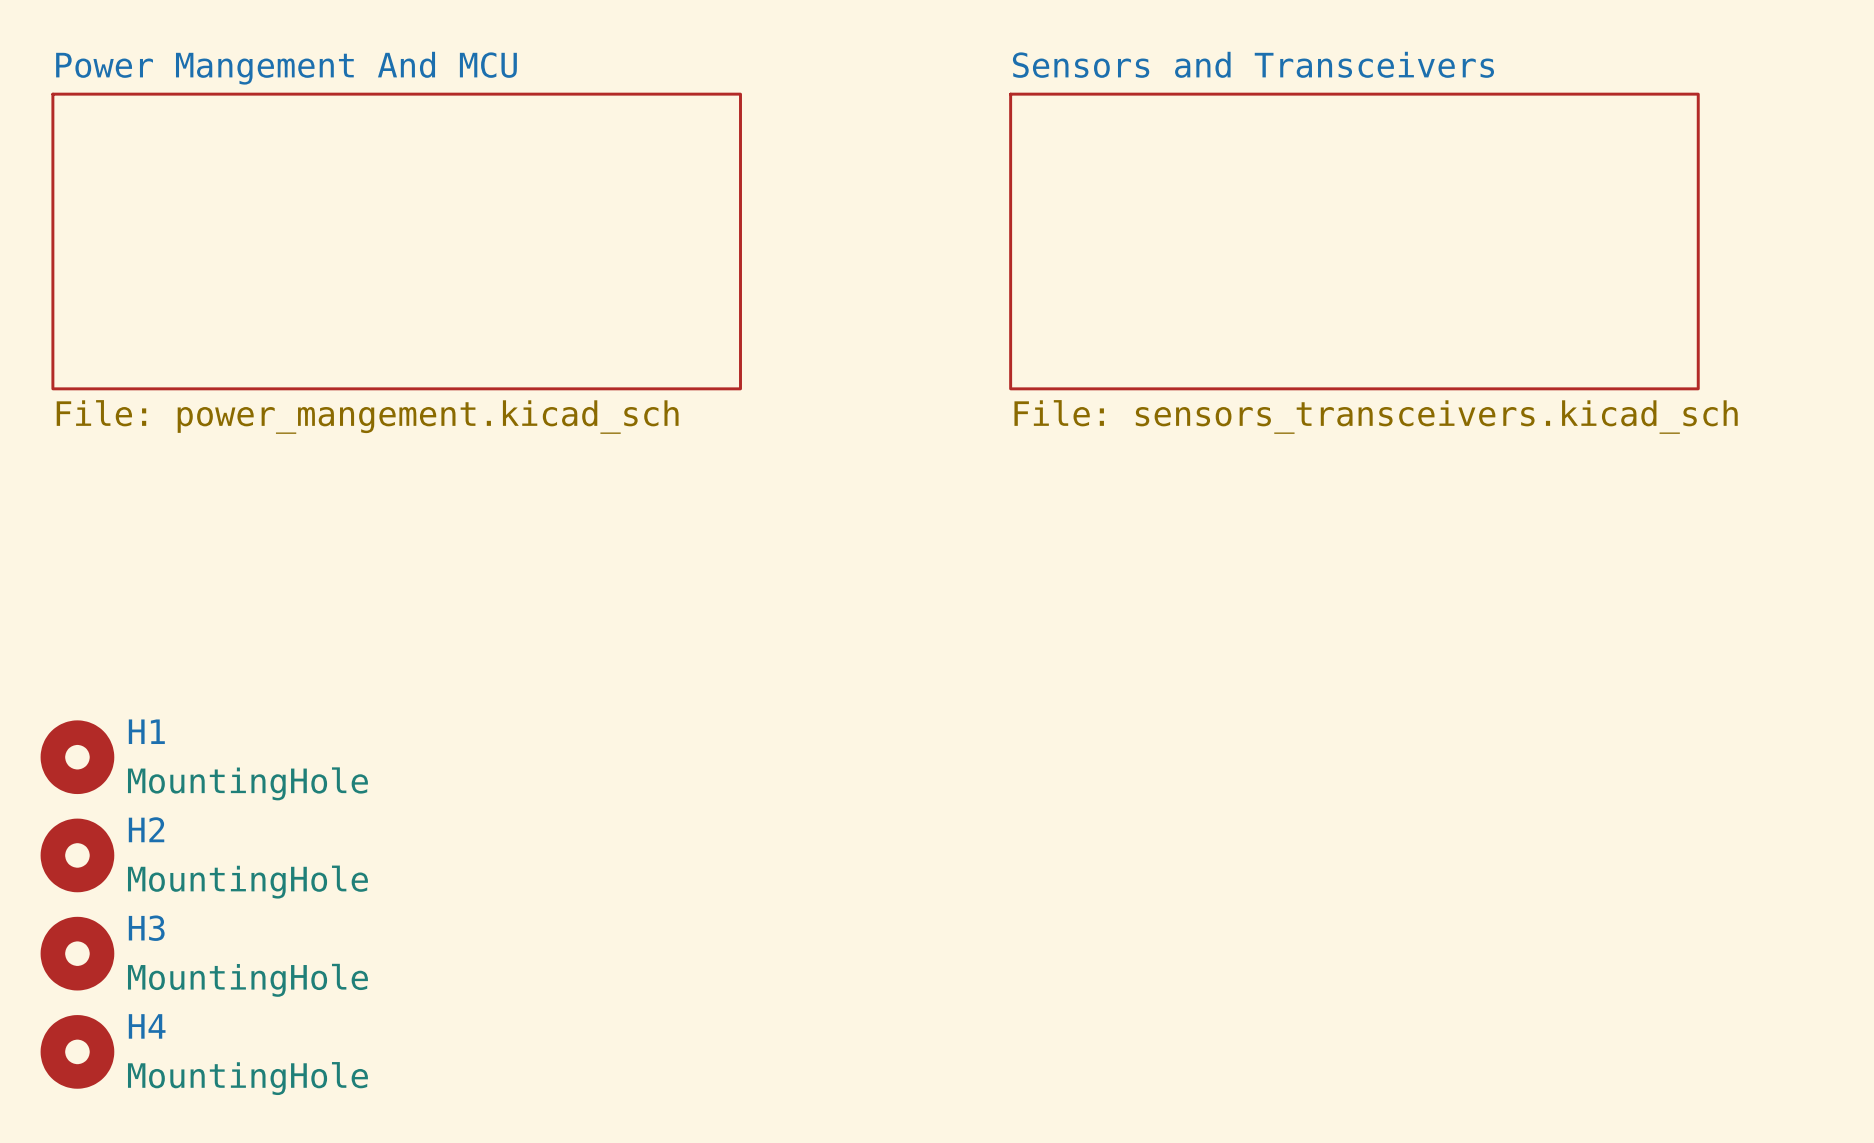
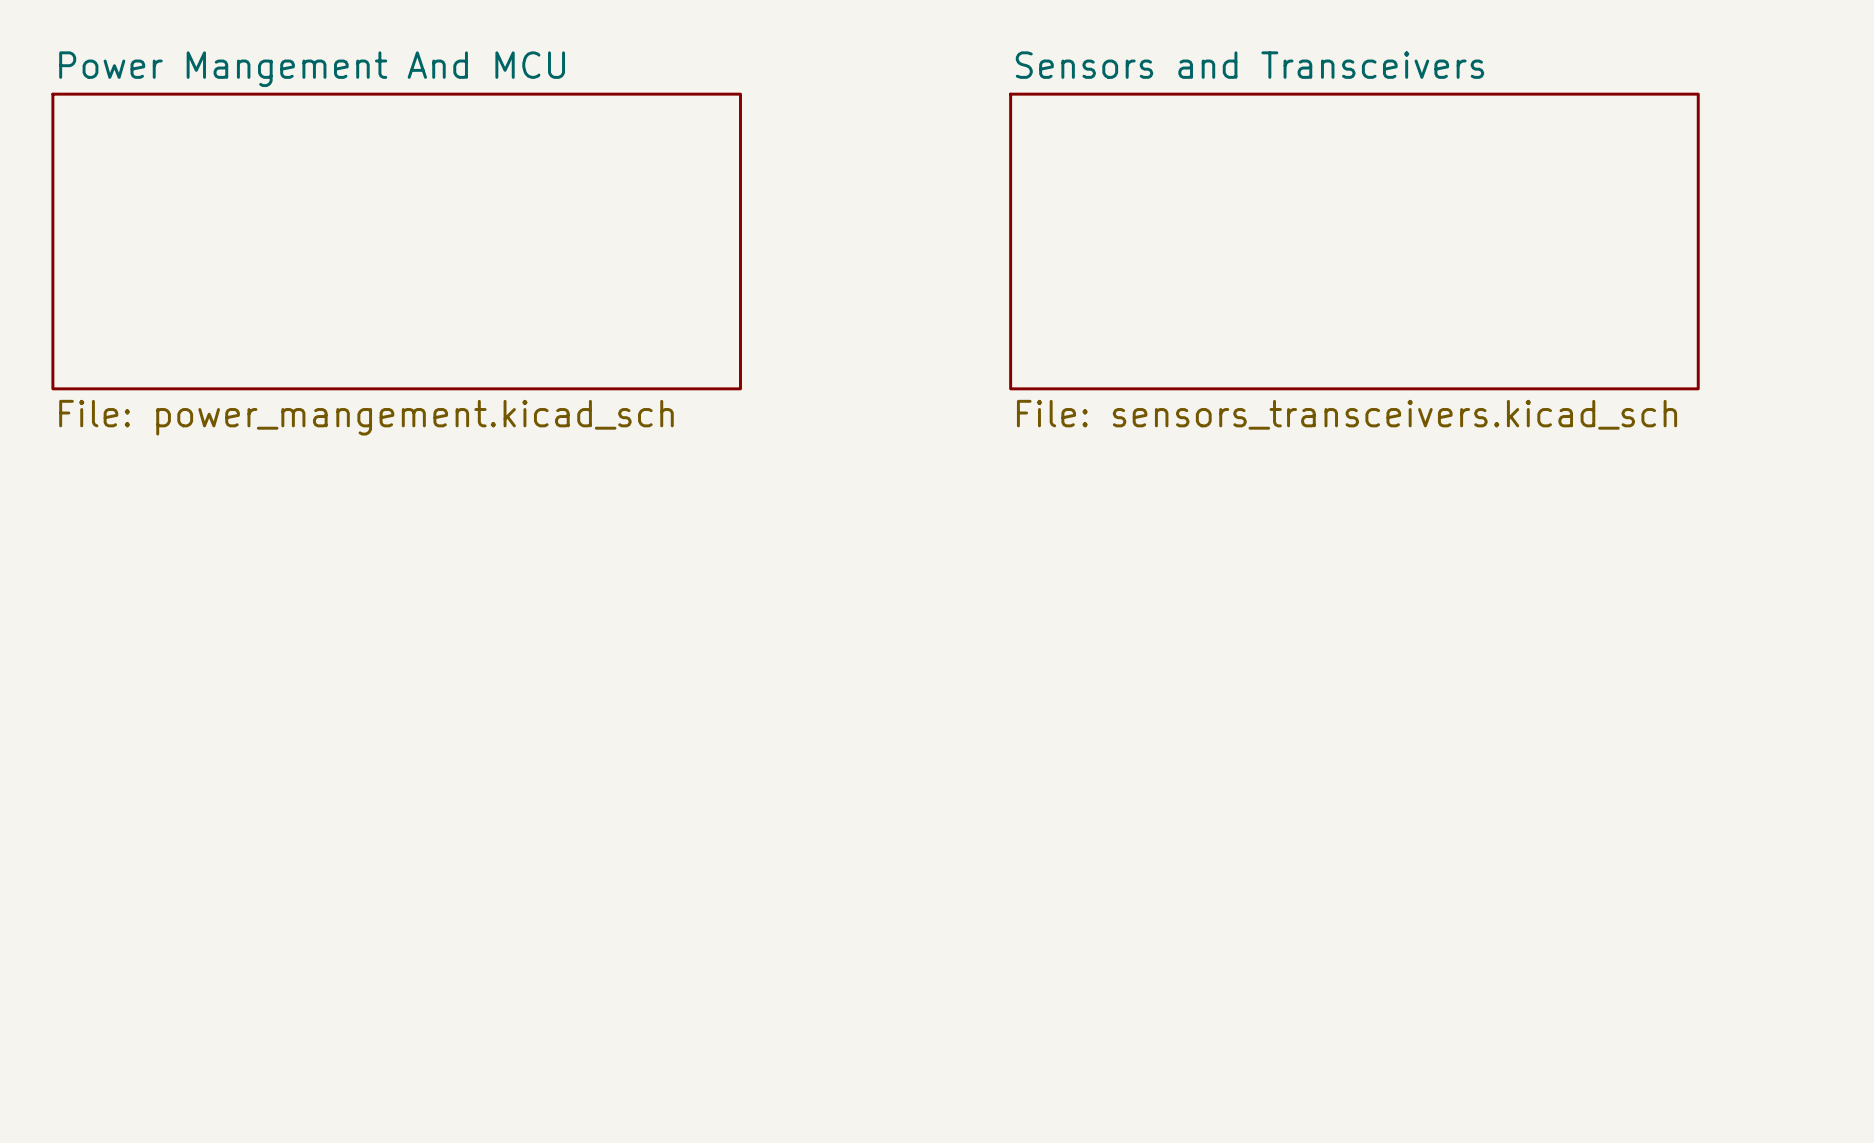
H1: MountingHole (77, 757) -> none
H2: MountingHole (77, 855) -> none
H3: MountingHole (77, 953) -> none
H4: MountingHole (77, 1051) -> none

